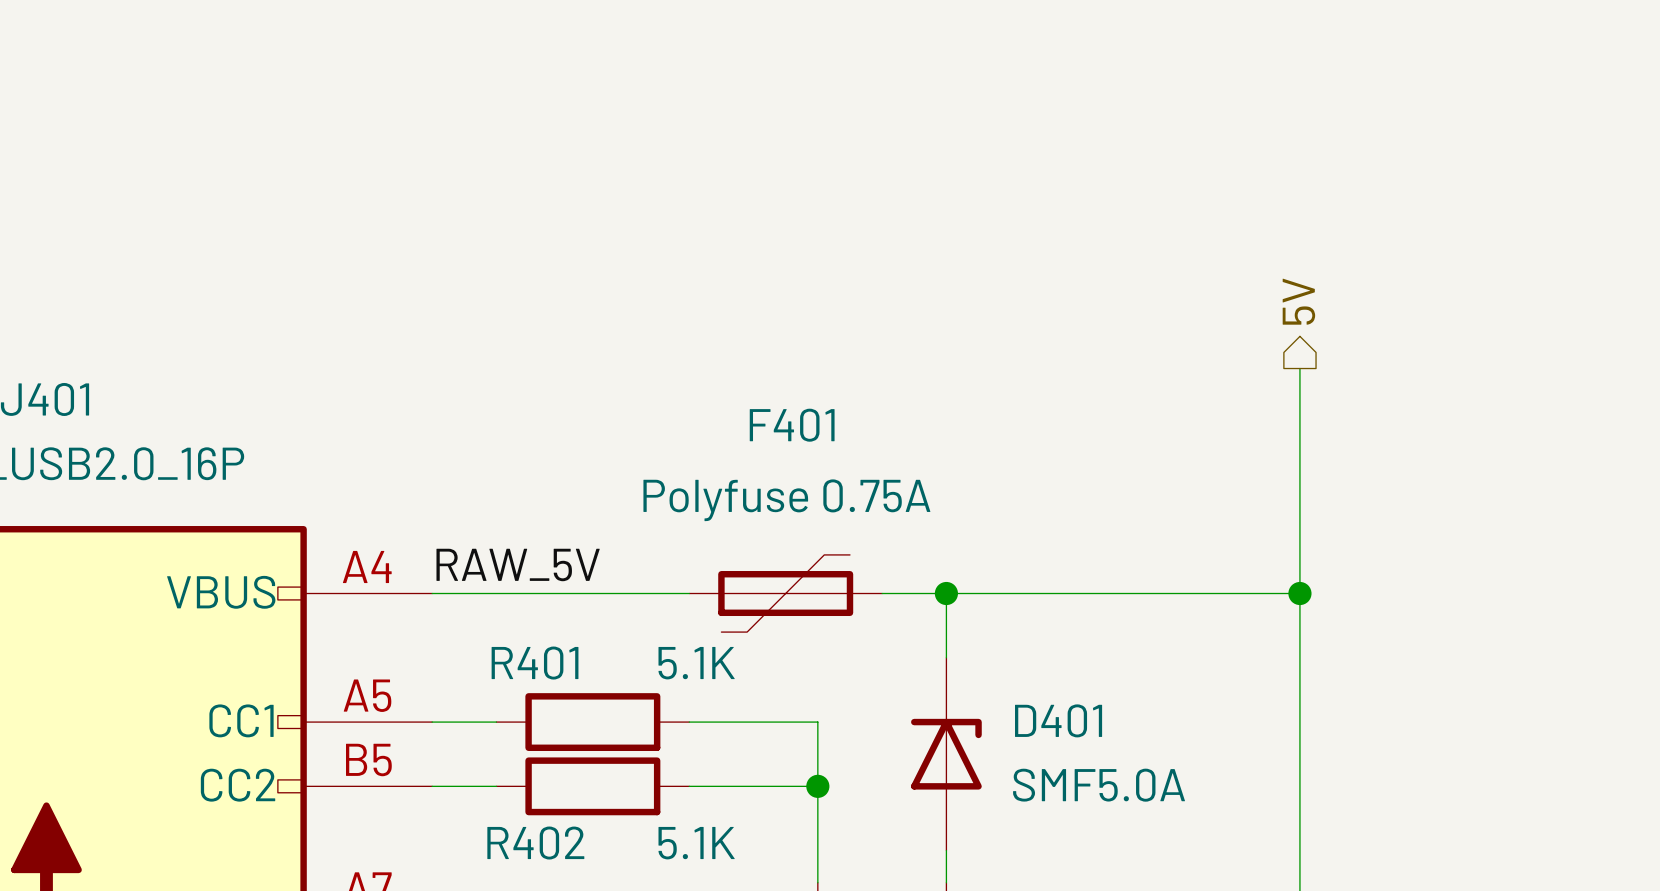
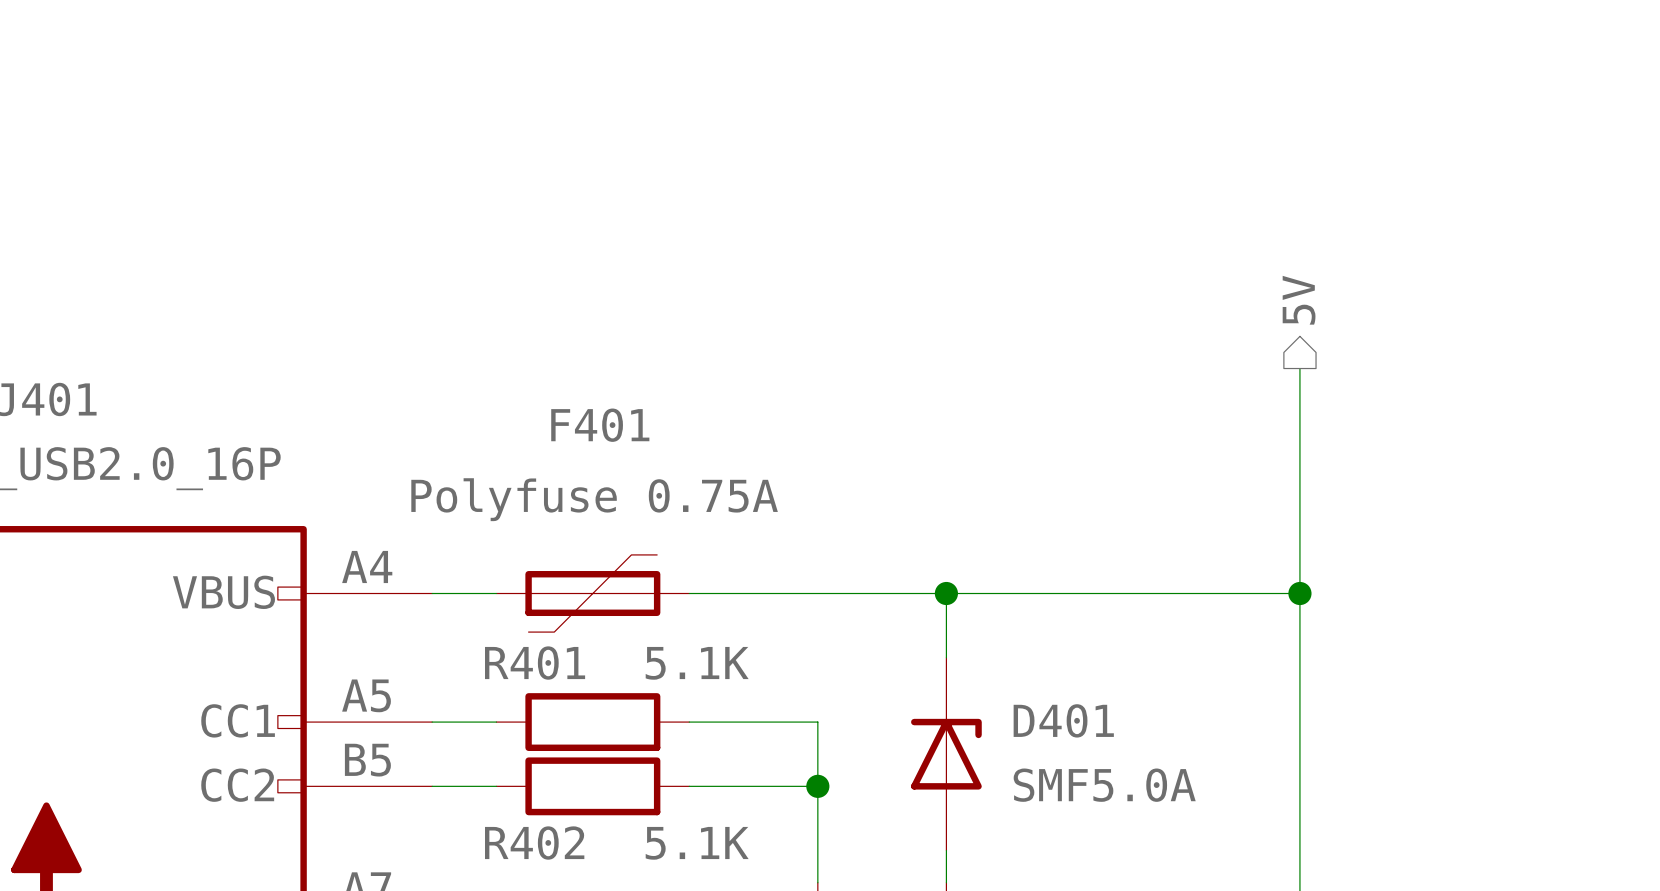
label: RAW_5V (518, 564) -> none
F401 position: (785, 593) -> (592, 593)

